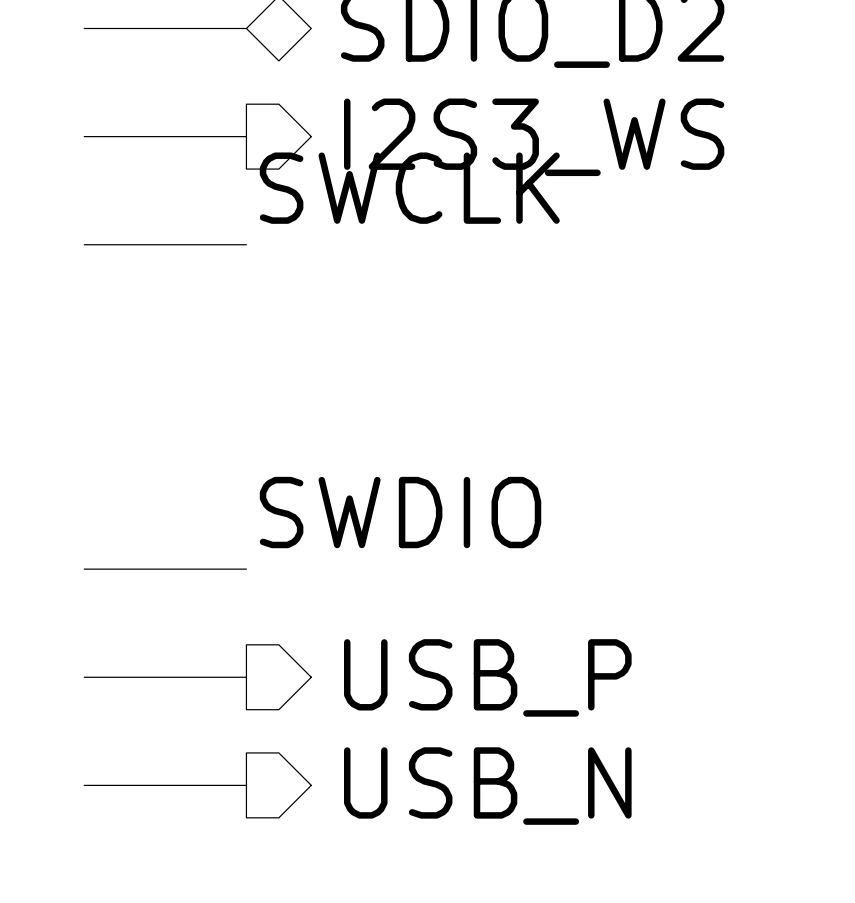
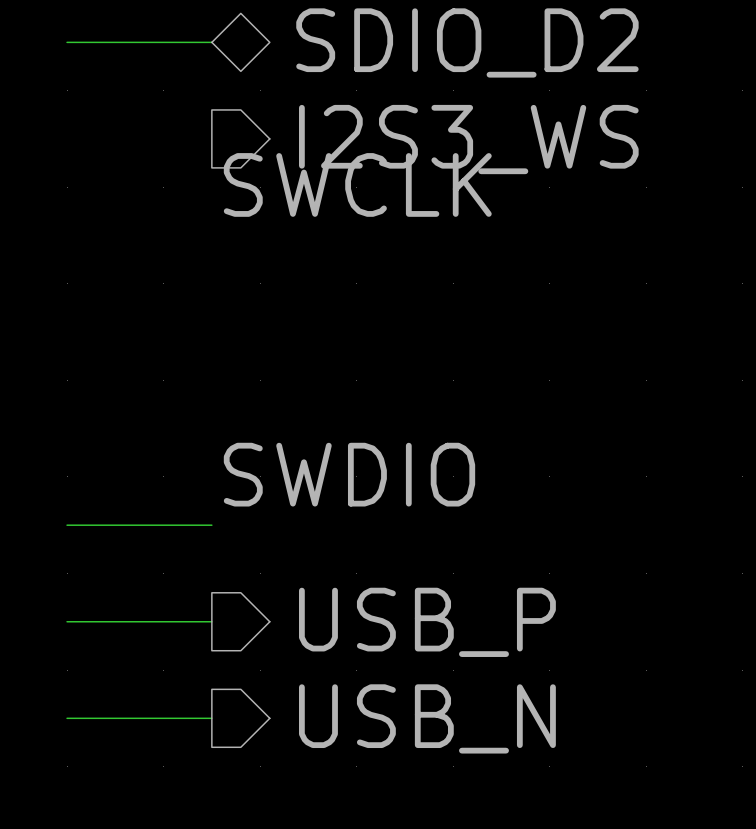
wire: (84, 136) (246, 136) -> none
wire: (84, 244) (246, 244) -> none

